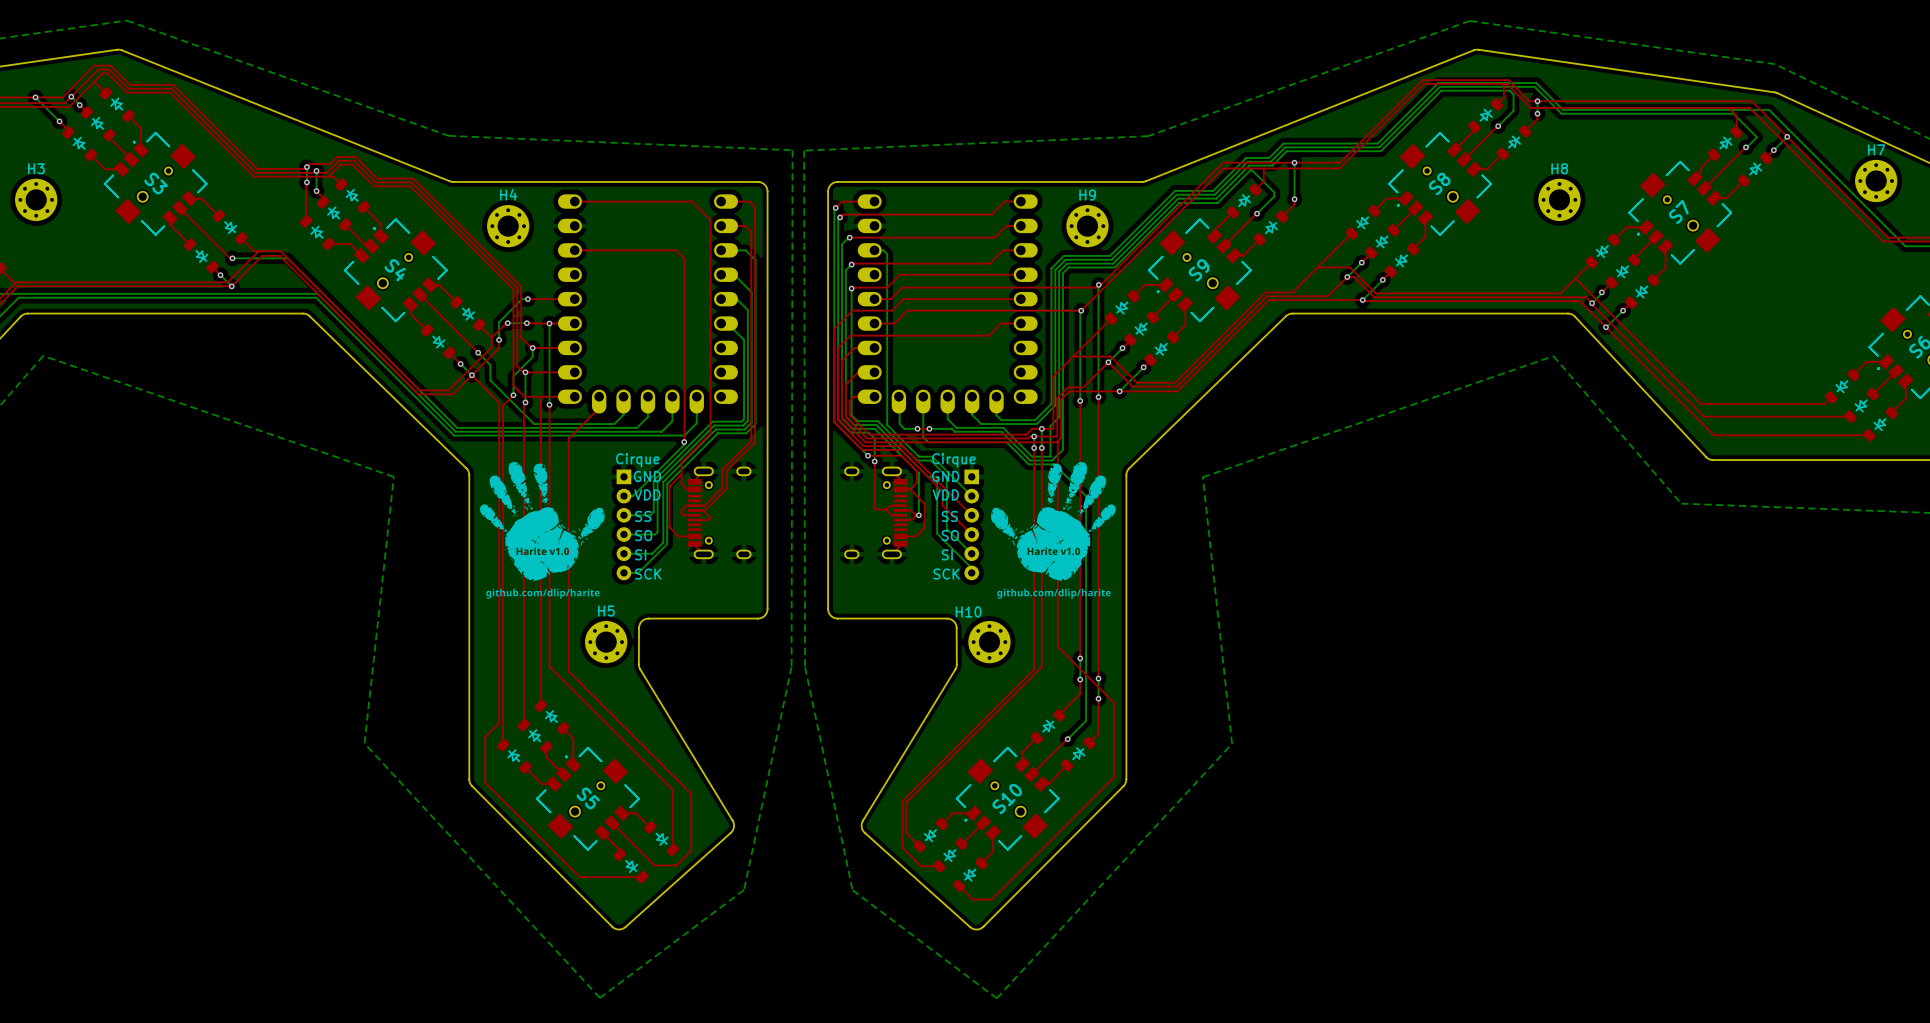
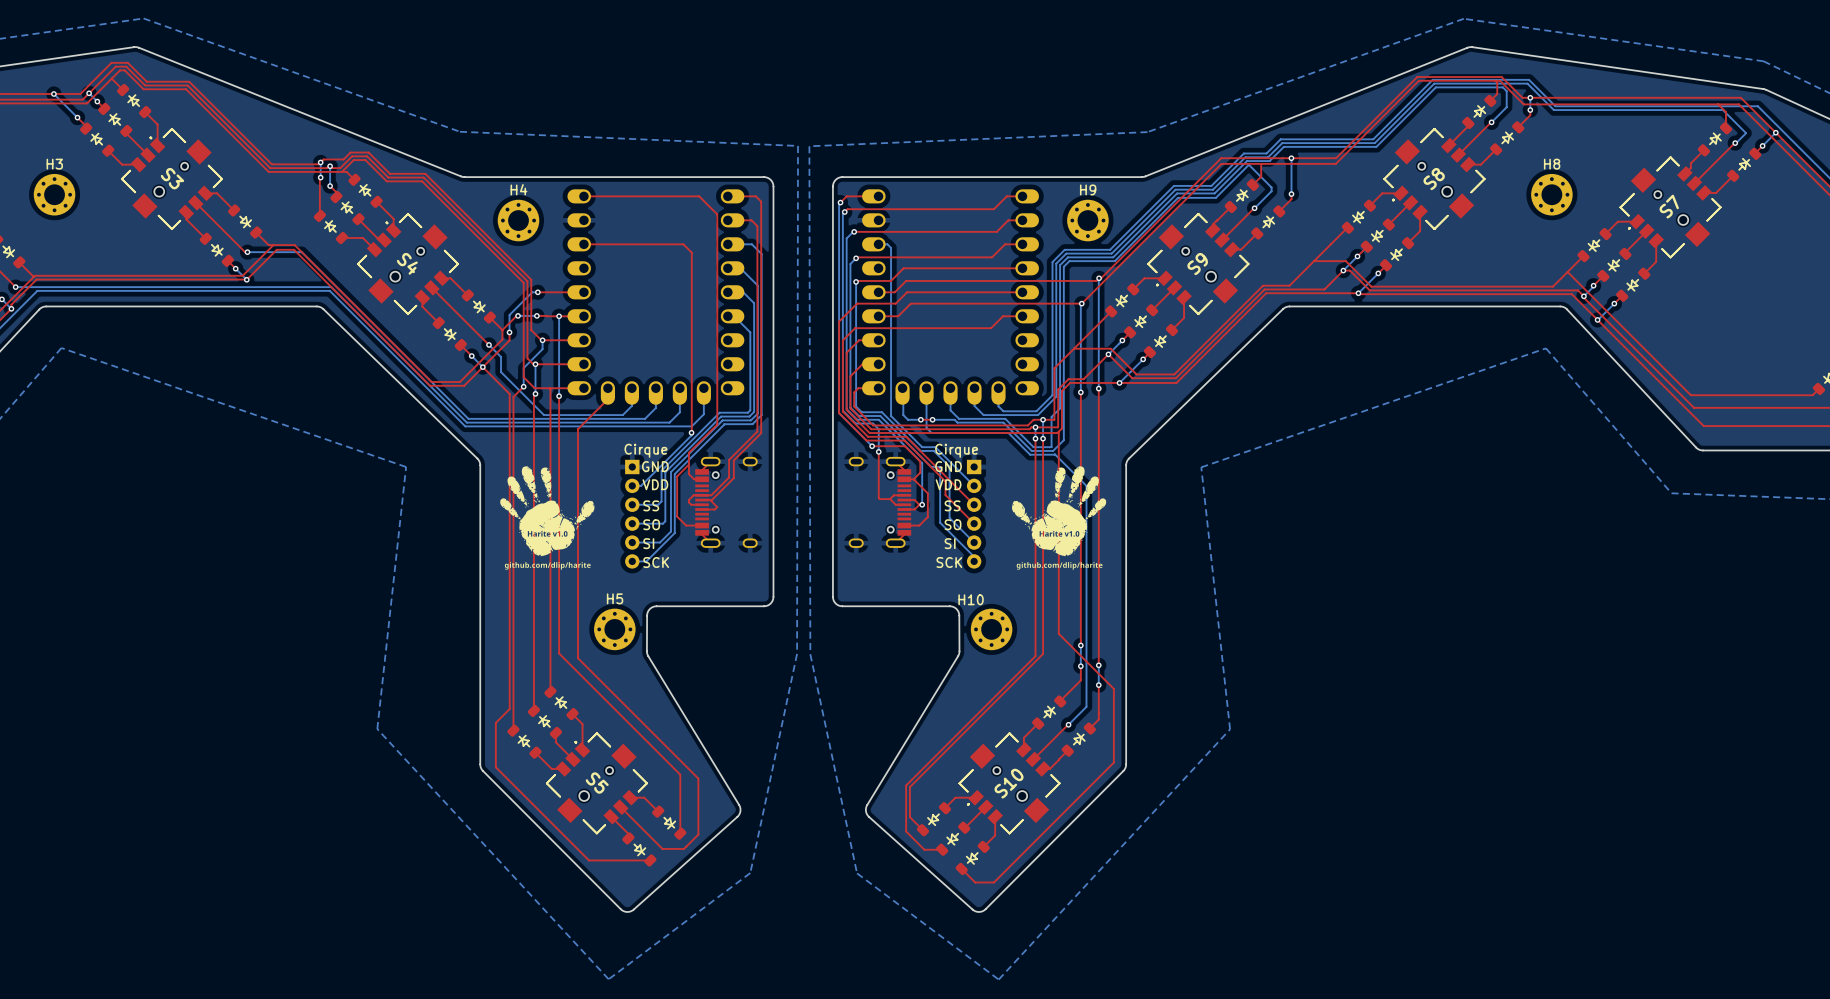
drawing shape: [480, 462, 605, 599] -> [500, 466, 595, 570]
drawing shape: [991, 462, 1116, 599] -> [1012, 466, 1107, 570]

